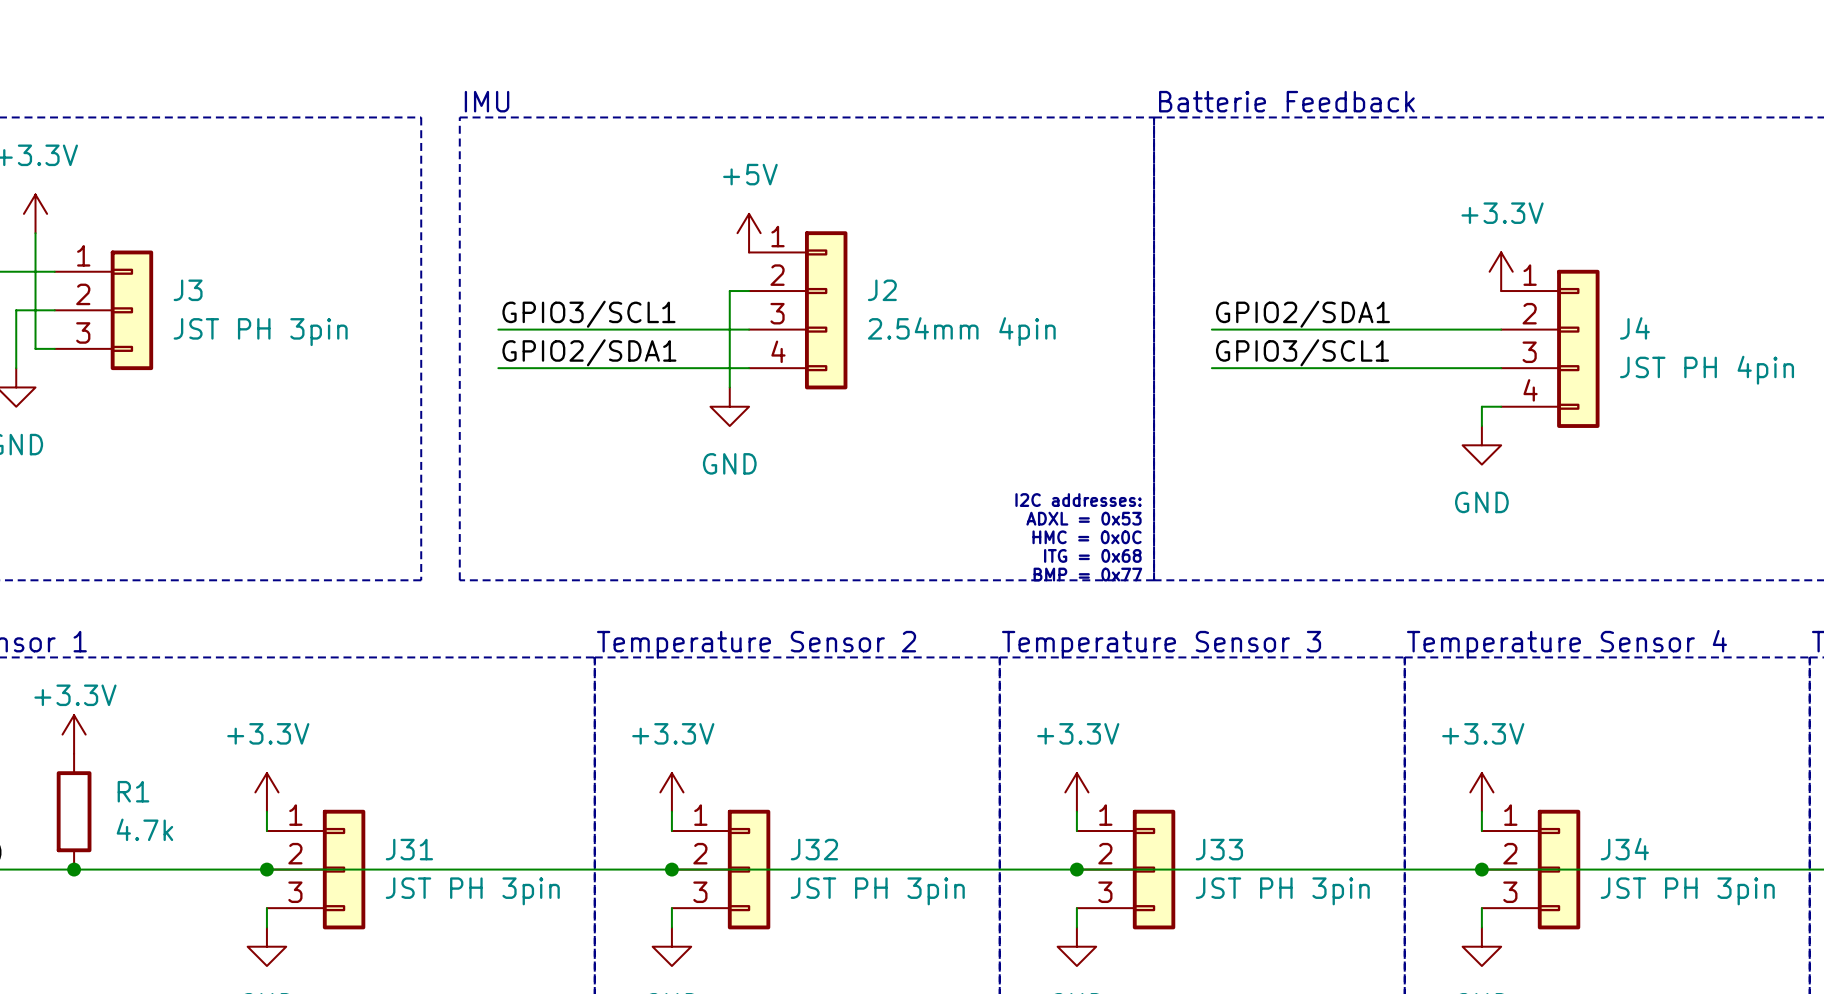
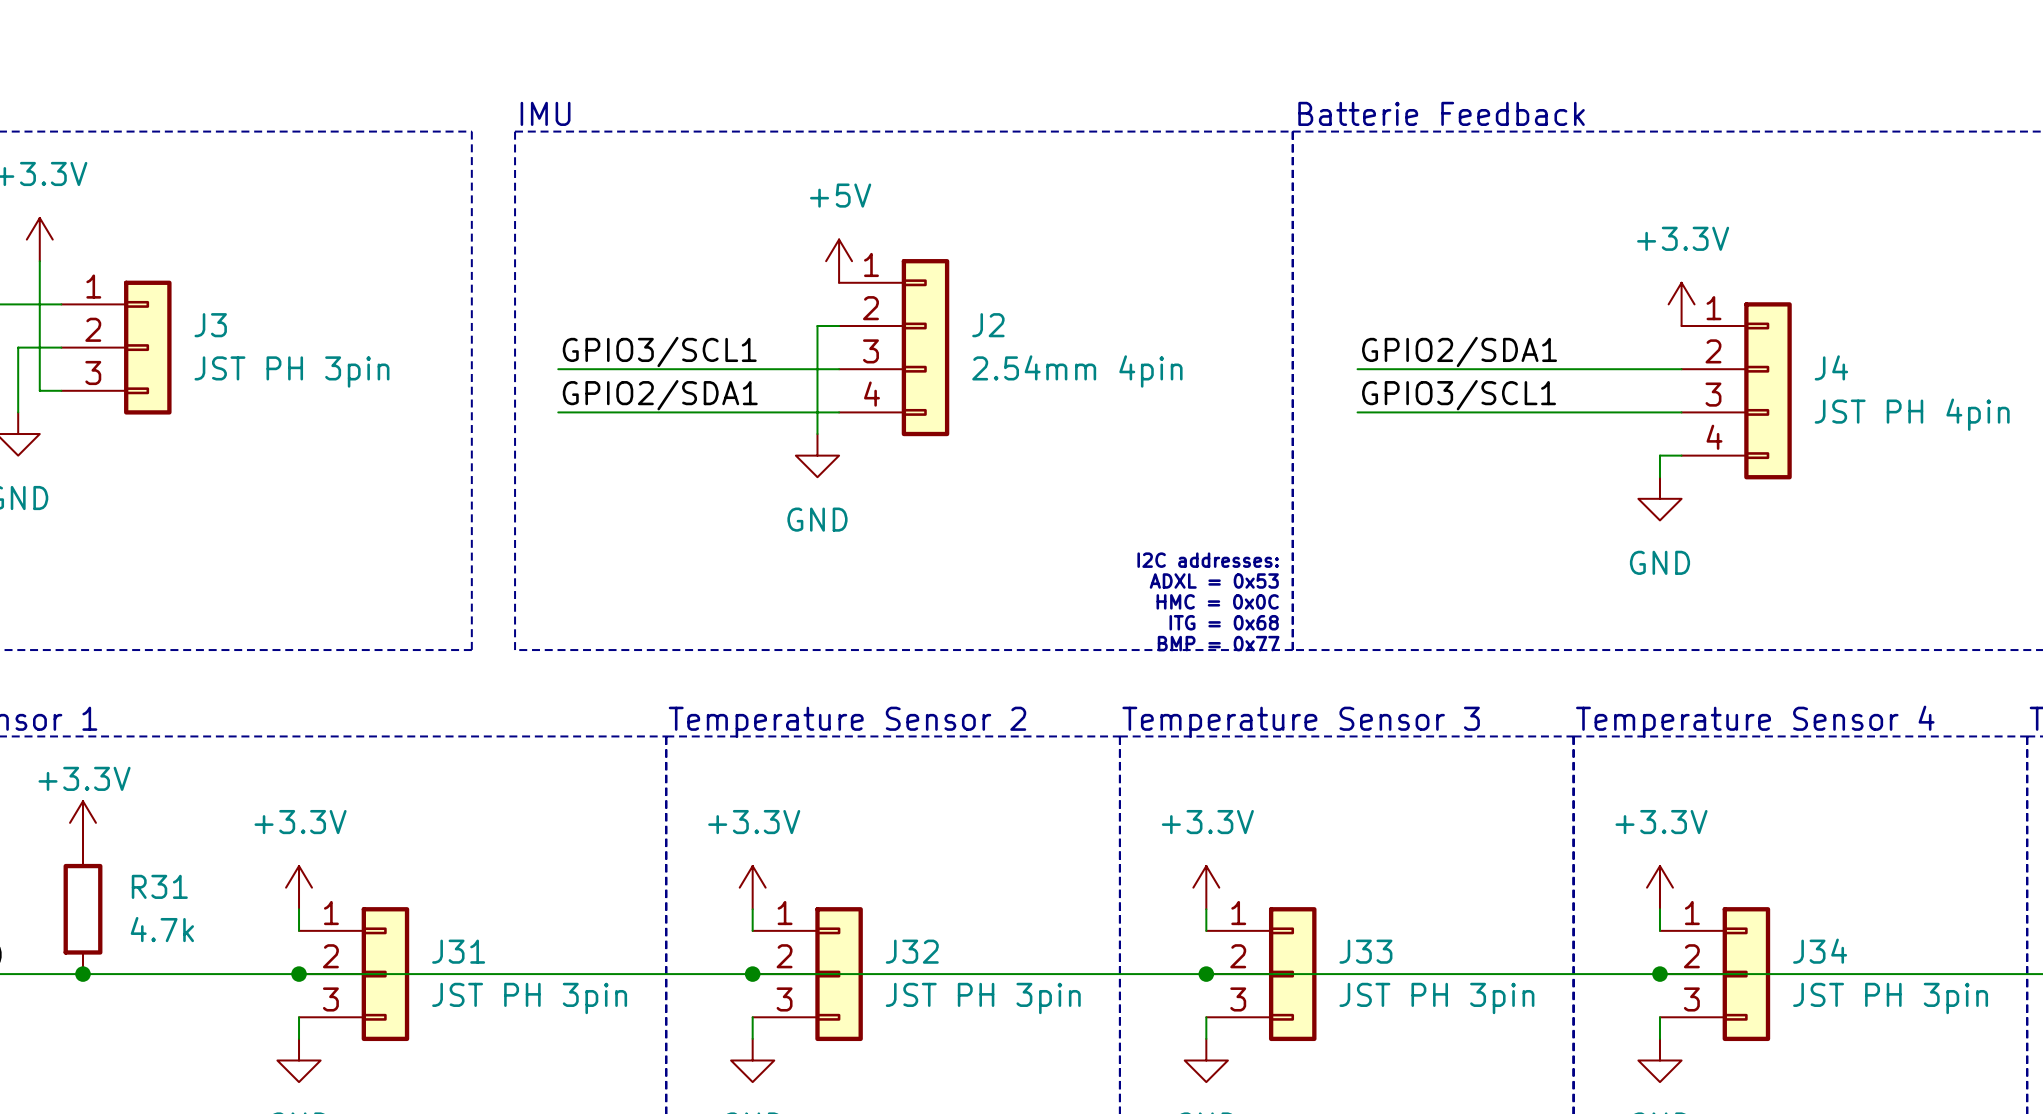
R1 name: R1 (133, 791) -> R31 (159, 886)

